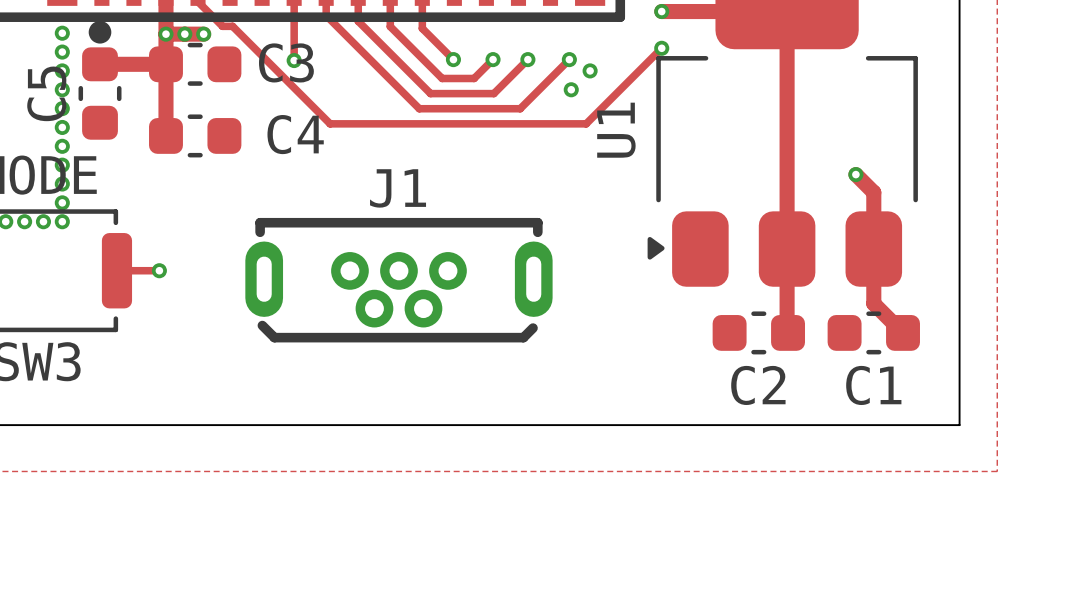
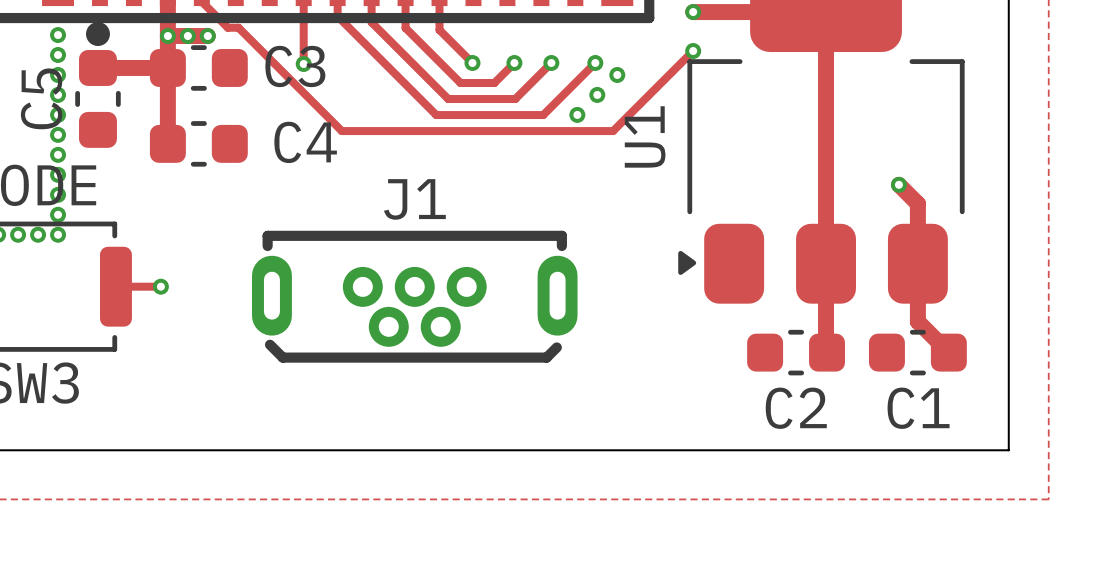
via: none -> (577, 114)

